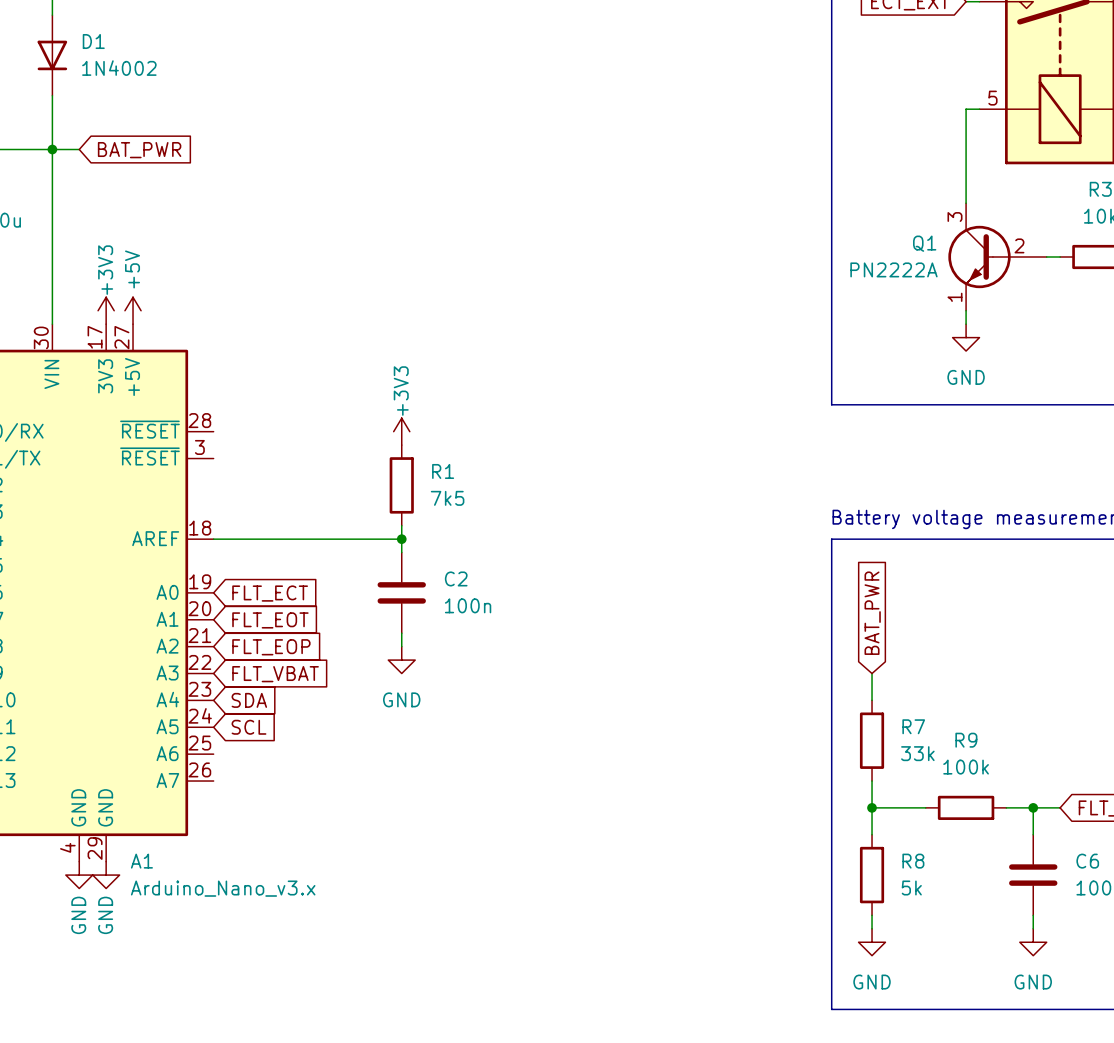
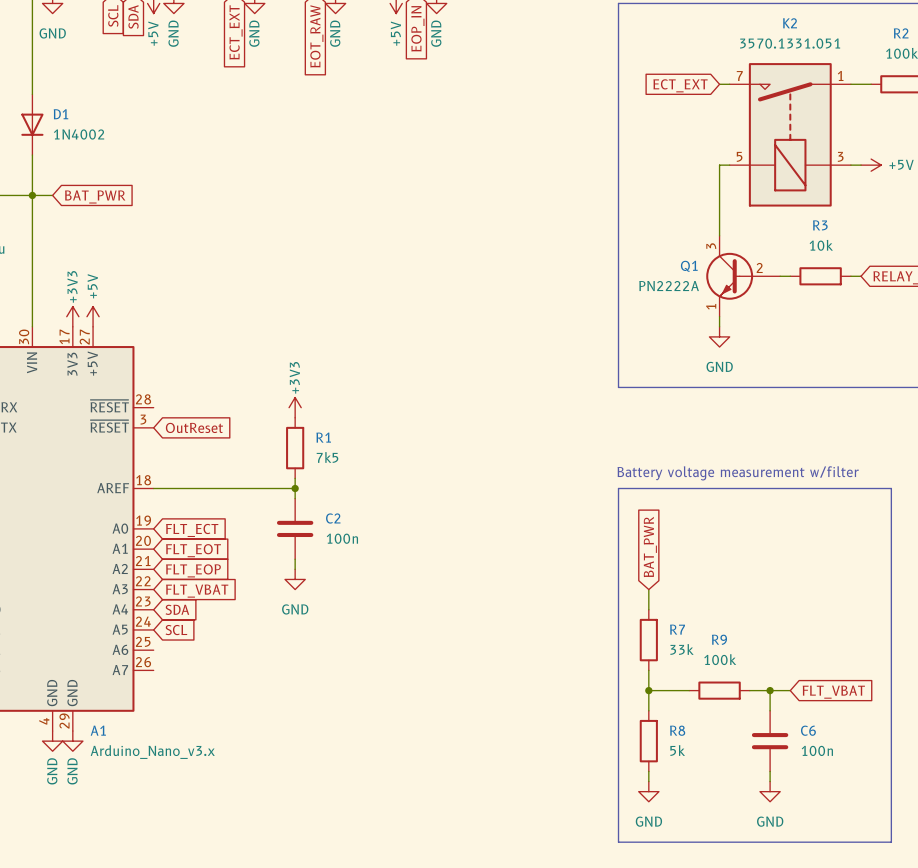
global label: none -> OutReset (194, 427)

